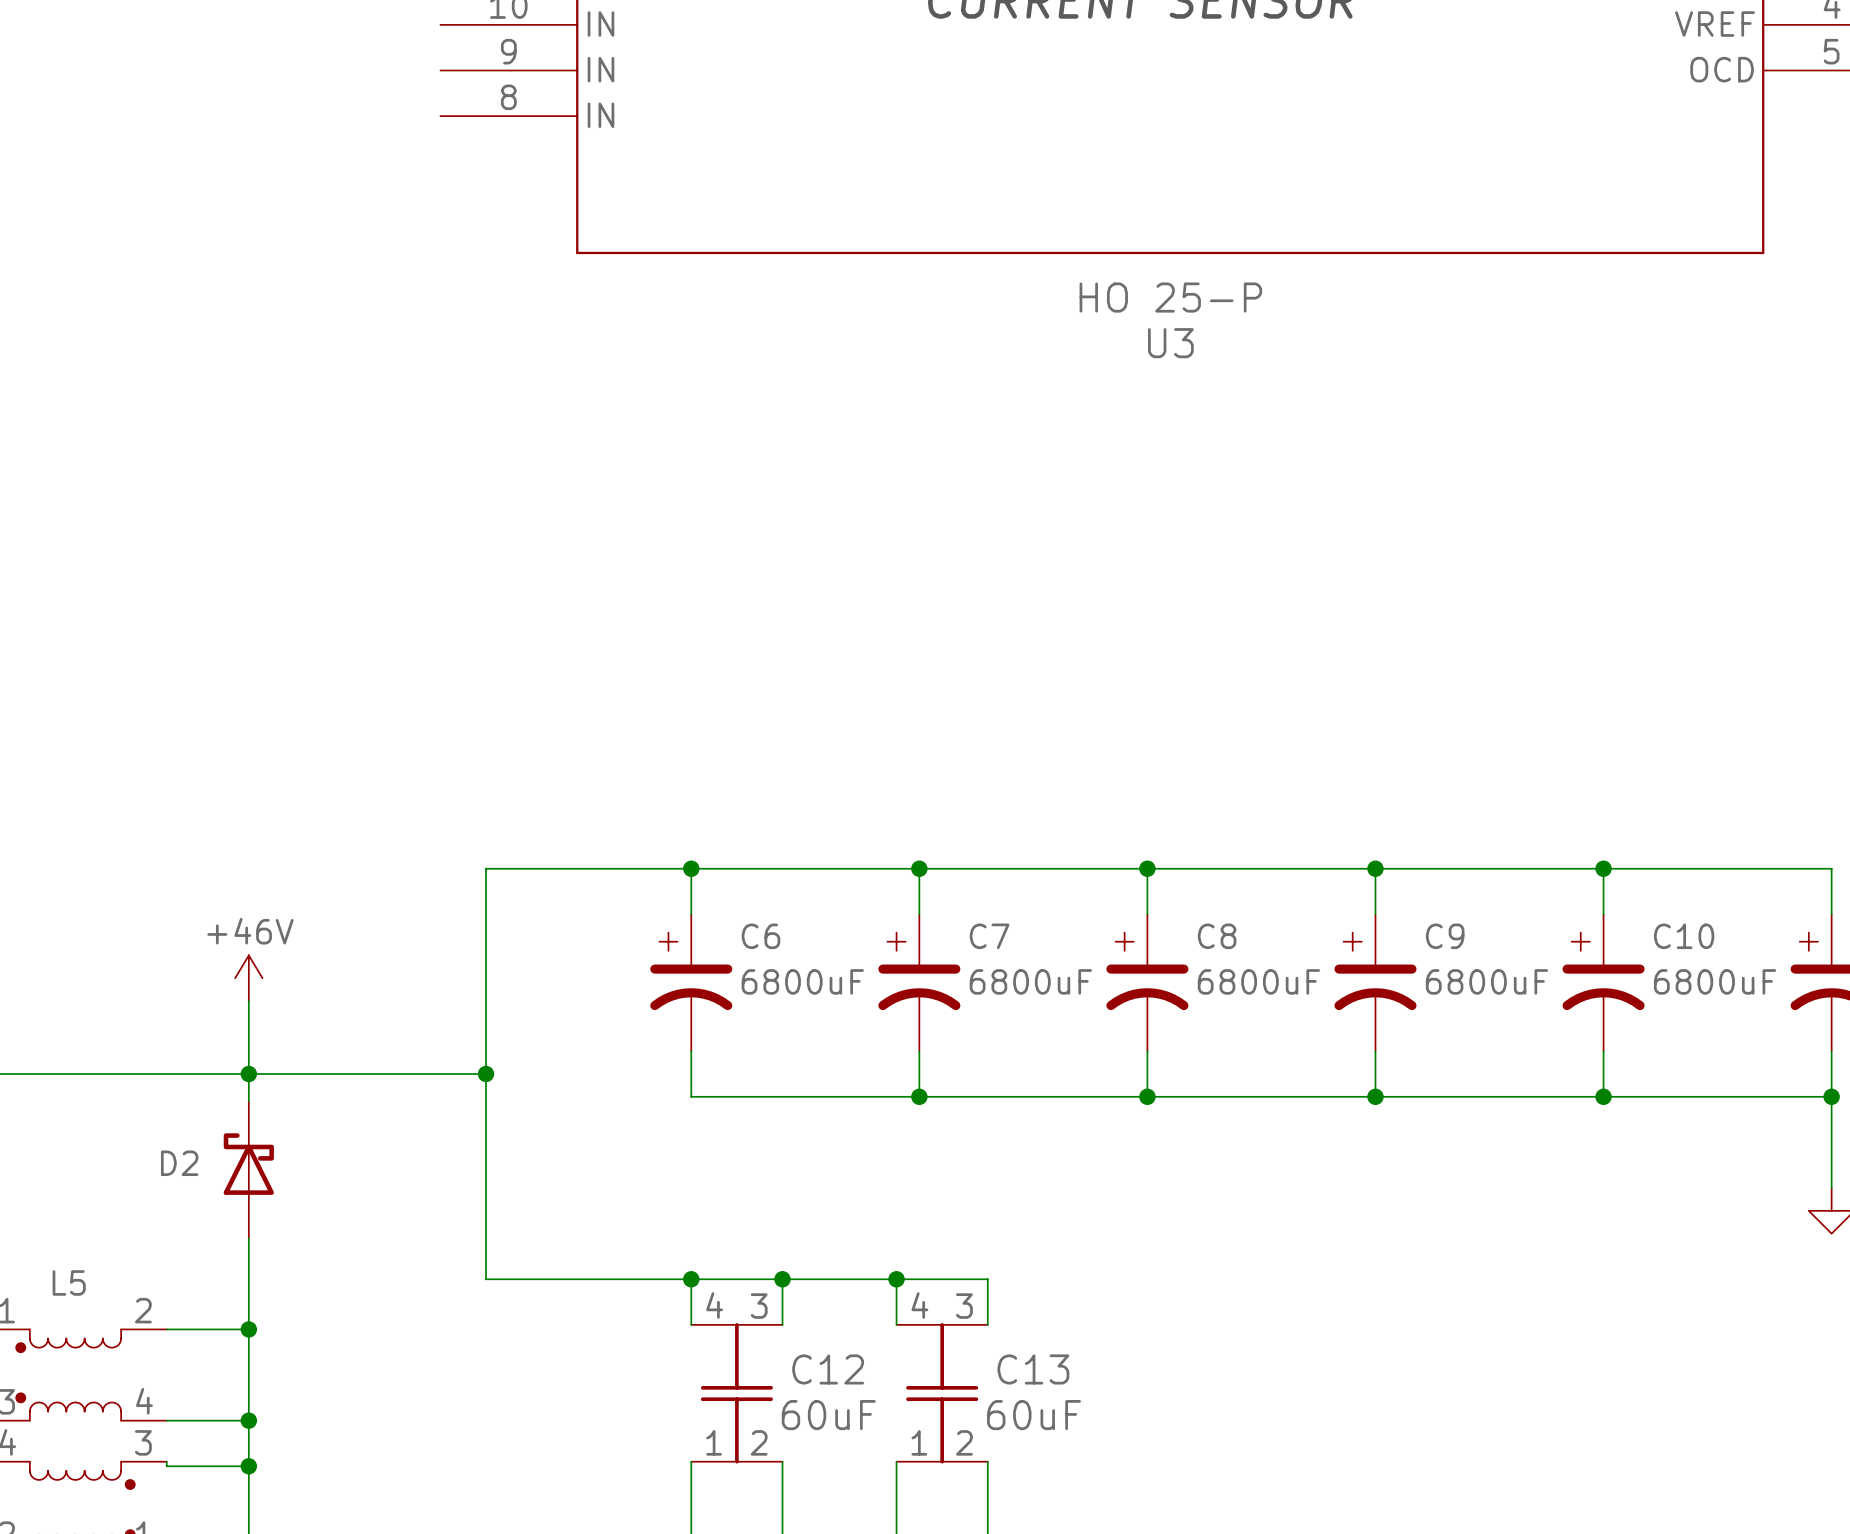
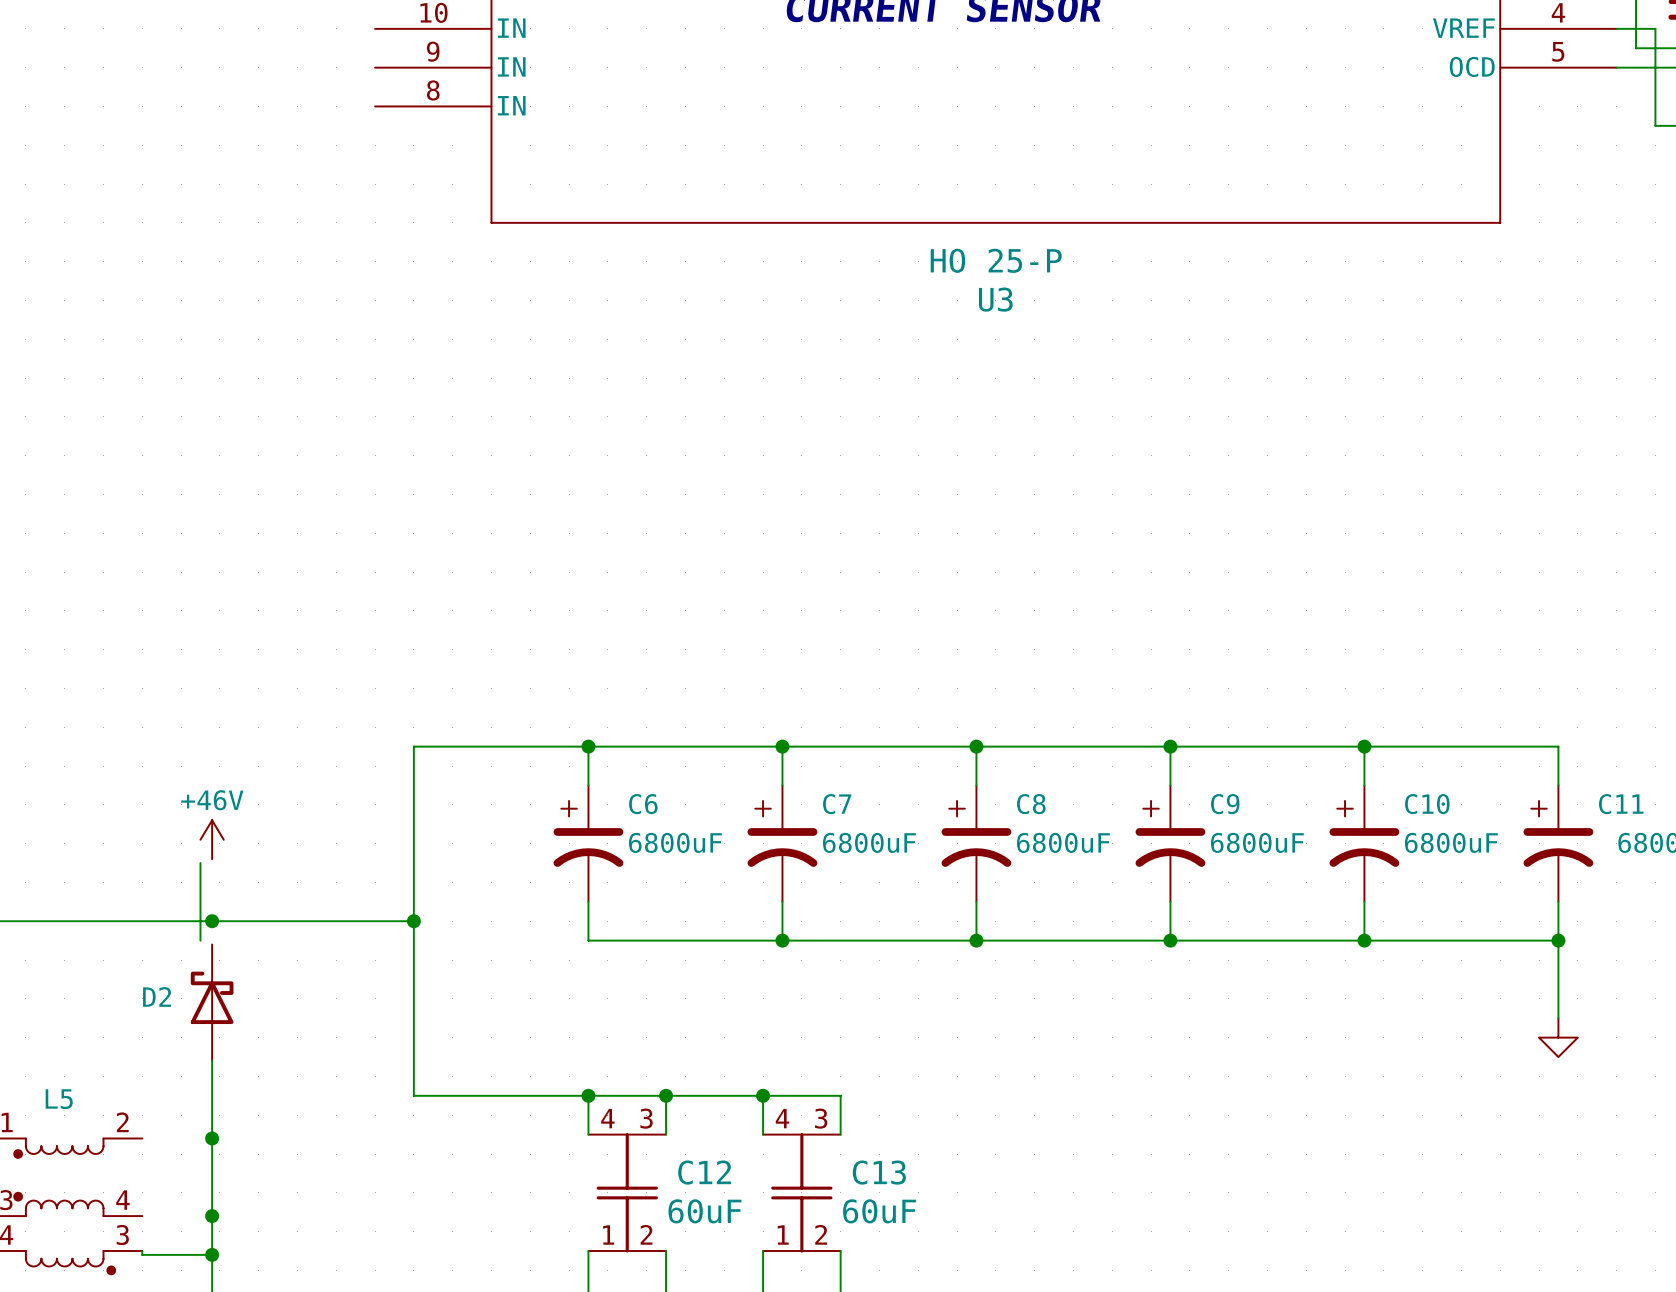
wire: (248, 1001) (248, 1101) -> none
wire: none -> (200, 863) (200, 940)
wire: (166, 1329) (248, 1329) -> none
wire: (166, 1420) (248, 1420) -> none

